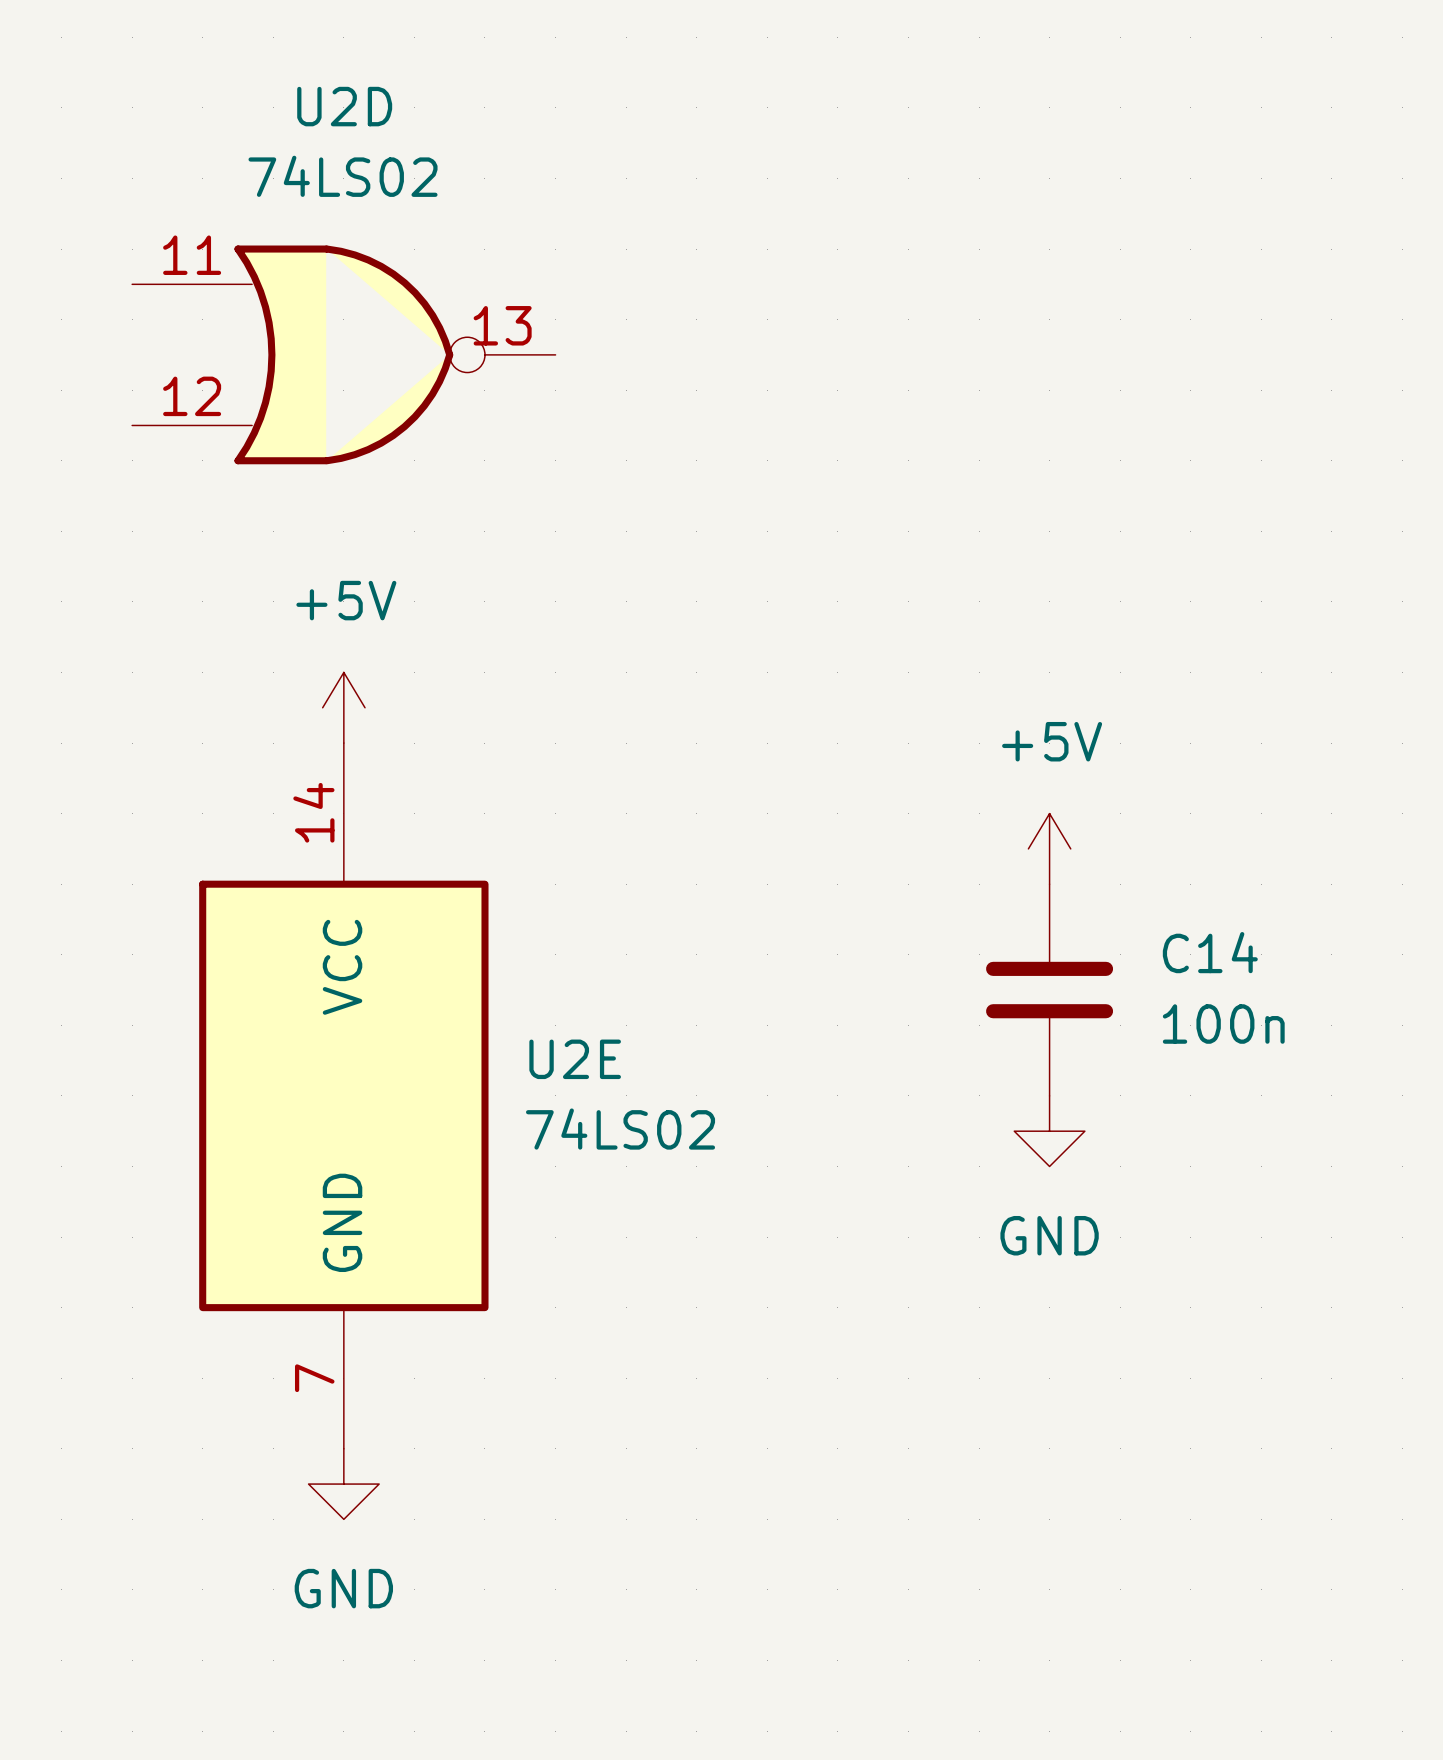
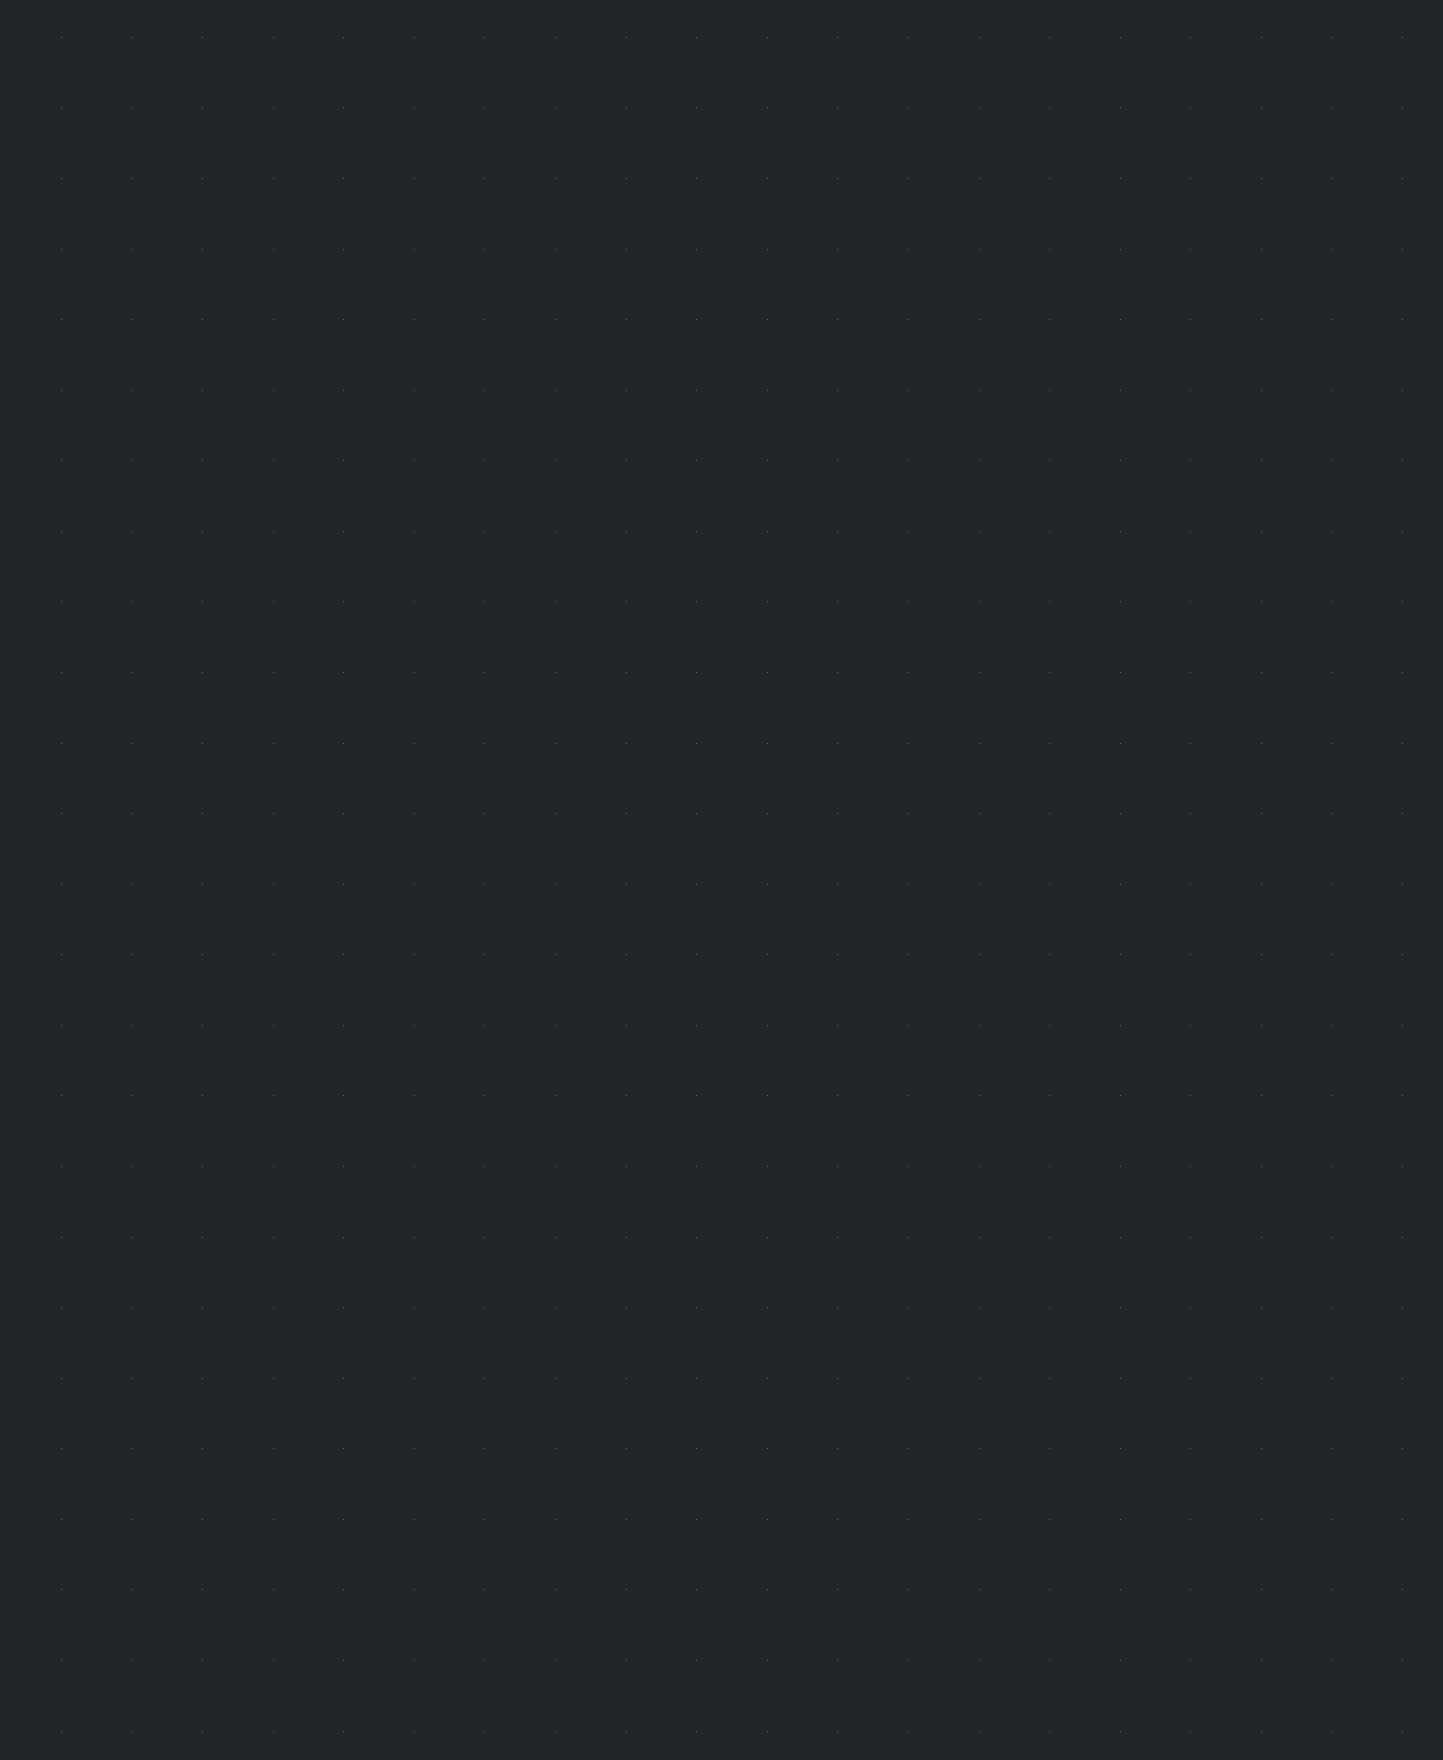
U2D: 74LS02 (343, 354) -> none
power symbol: +5V (343, 707) -> none
power symbol: +5V (1049, 848) -> none
C14: 100n (1049, 990) -> none
U2E: 74LS02 (343, 1095) -> none
power symbol: GND (1049, 1131) -> none
power symbol: GND (343, 1484) -> none

